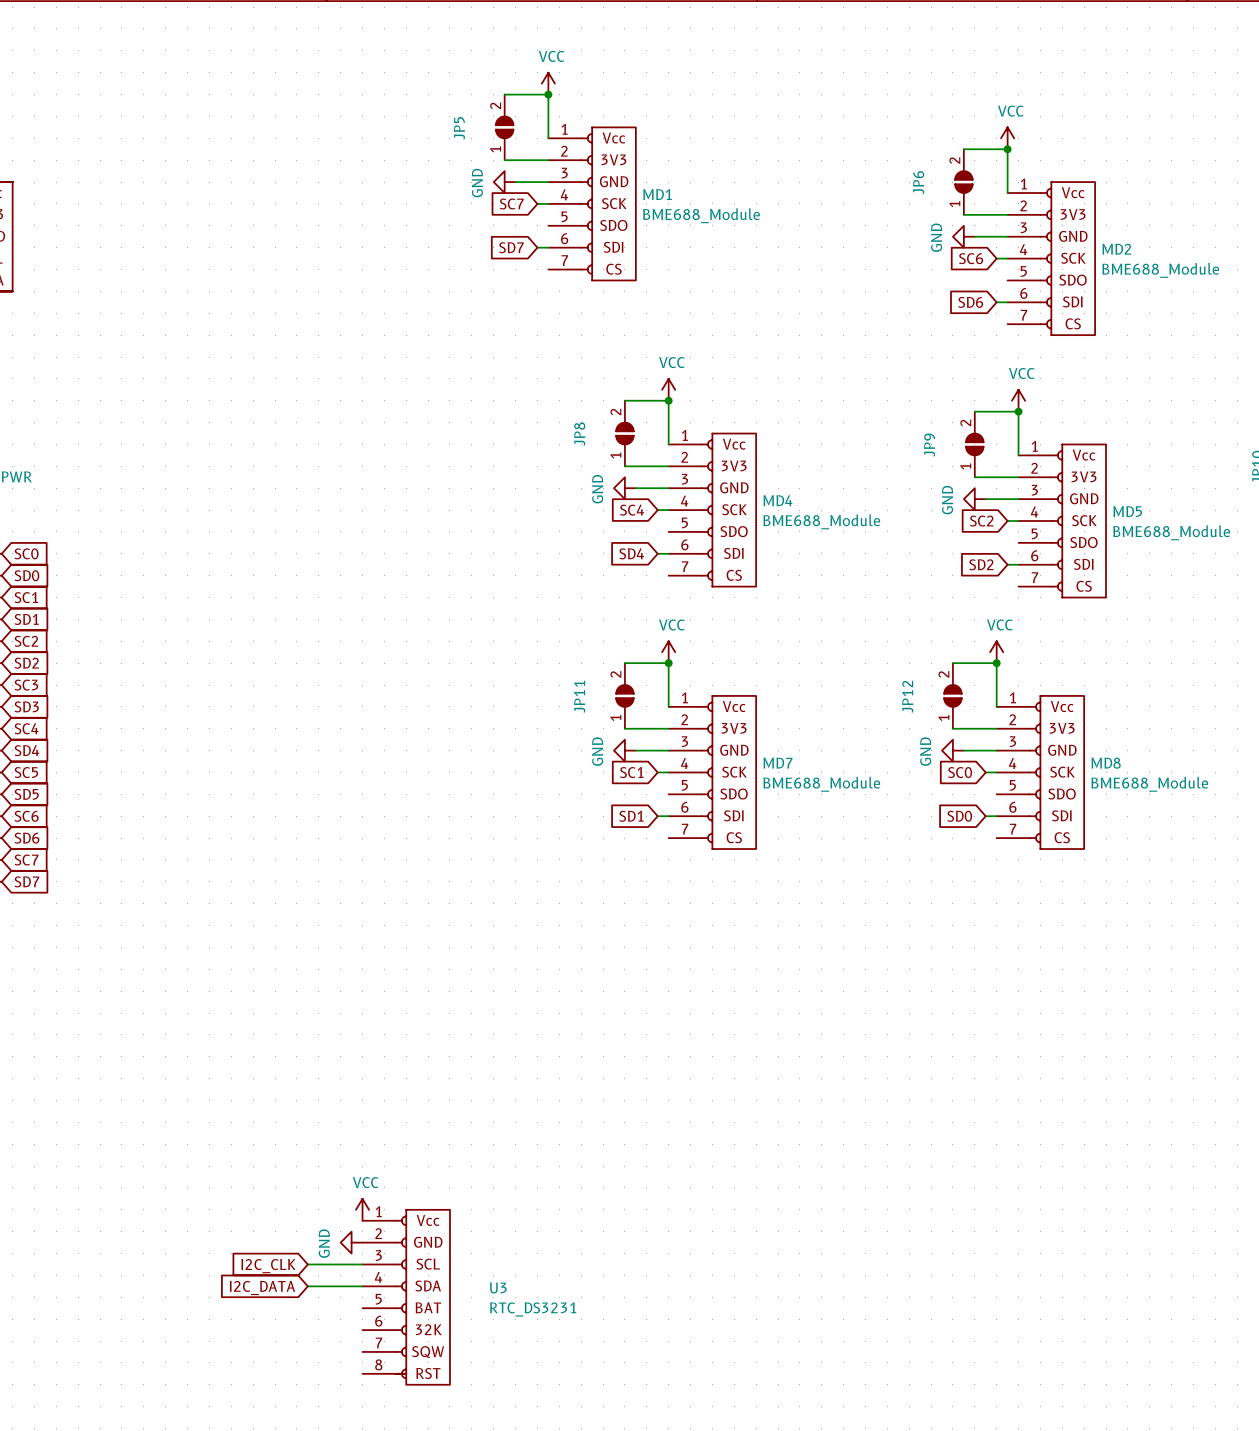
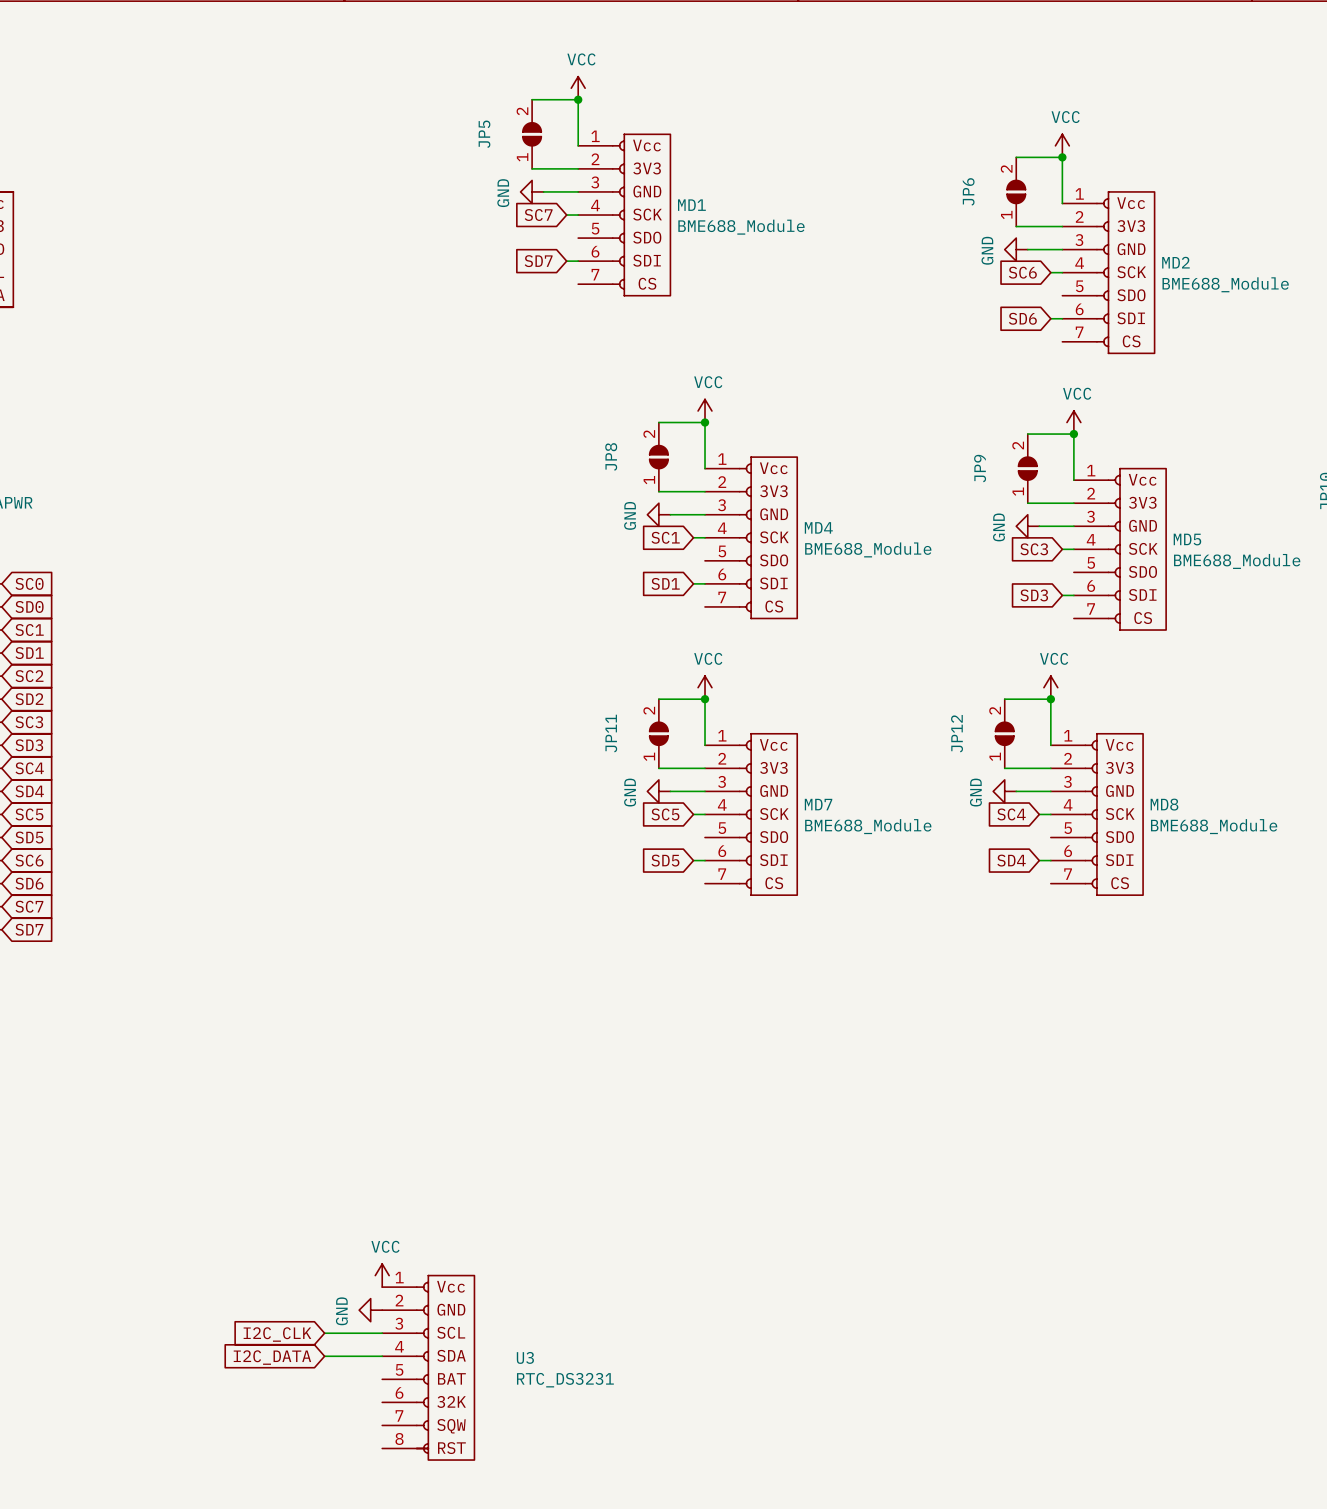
global label: SC4 (632, 510) -> SC1 (665, 537)
global label: SC2 (981, 521) -> SC3 (1034, 549)
global label: SD4 (631, 553) -> SD1 (665, 583)
global label: SD2 (981, 564) -> SD3 (1034, 595)
global label: SC1 (631, 772) -> SC5 (665, 814)
global label: SC0 (960, 772) -> SC4 (1011, 814)
global label: SD1 (631, 816) -> SD5 (665, 860)
global label: SD0 (959, 816) -> SD4 (1011, 860)

